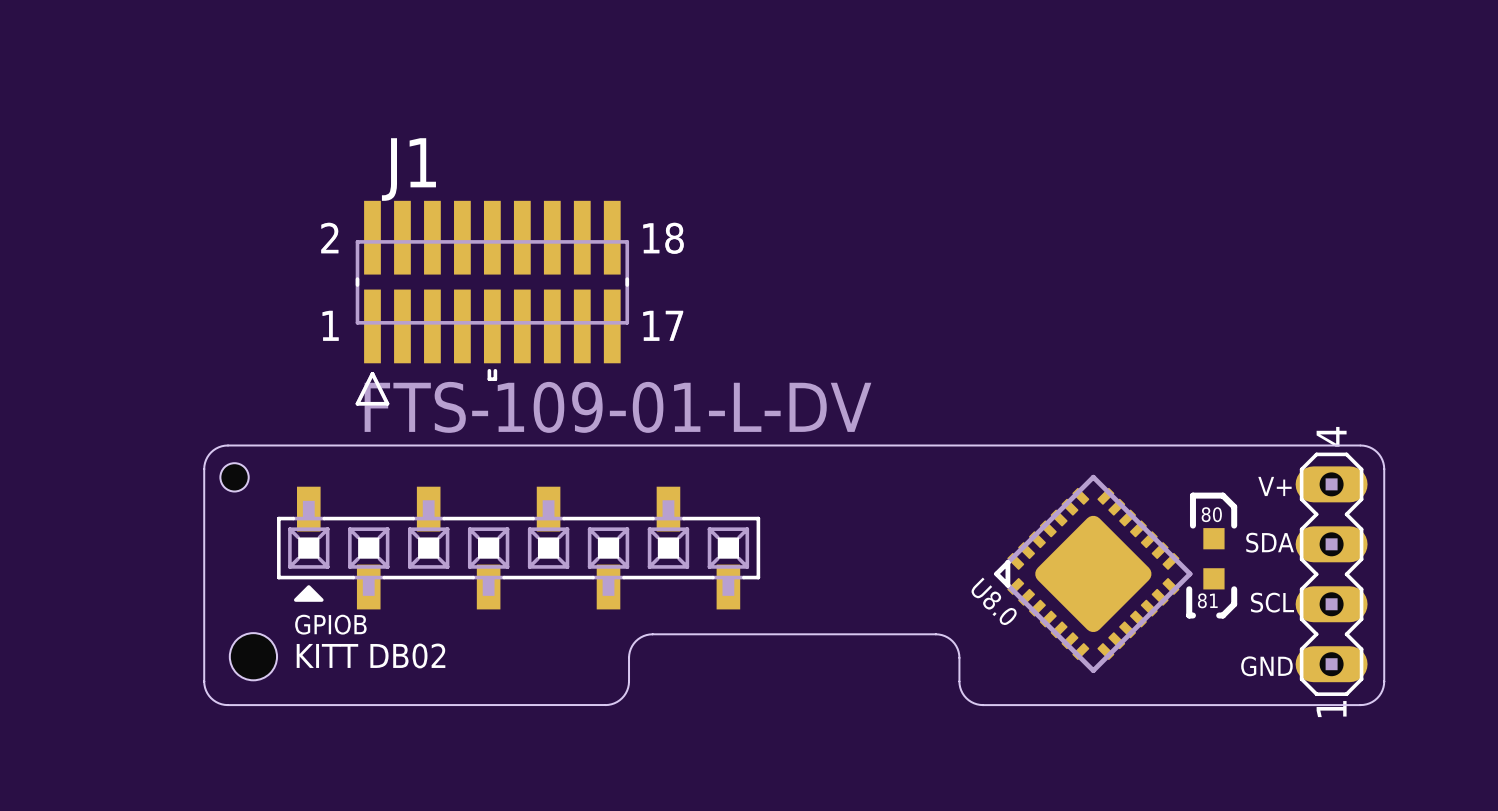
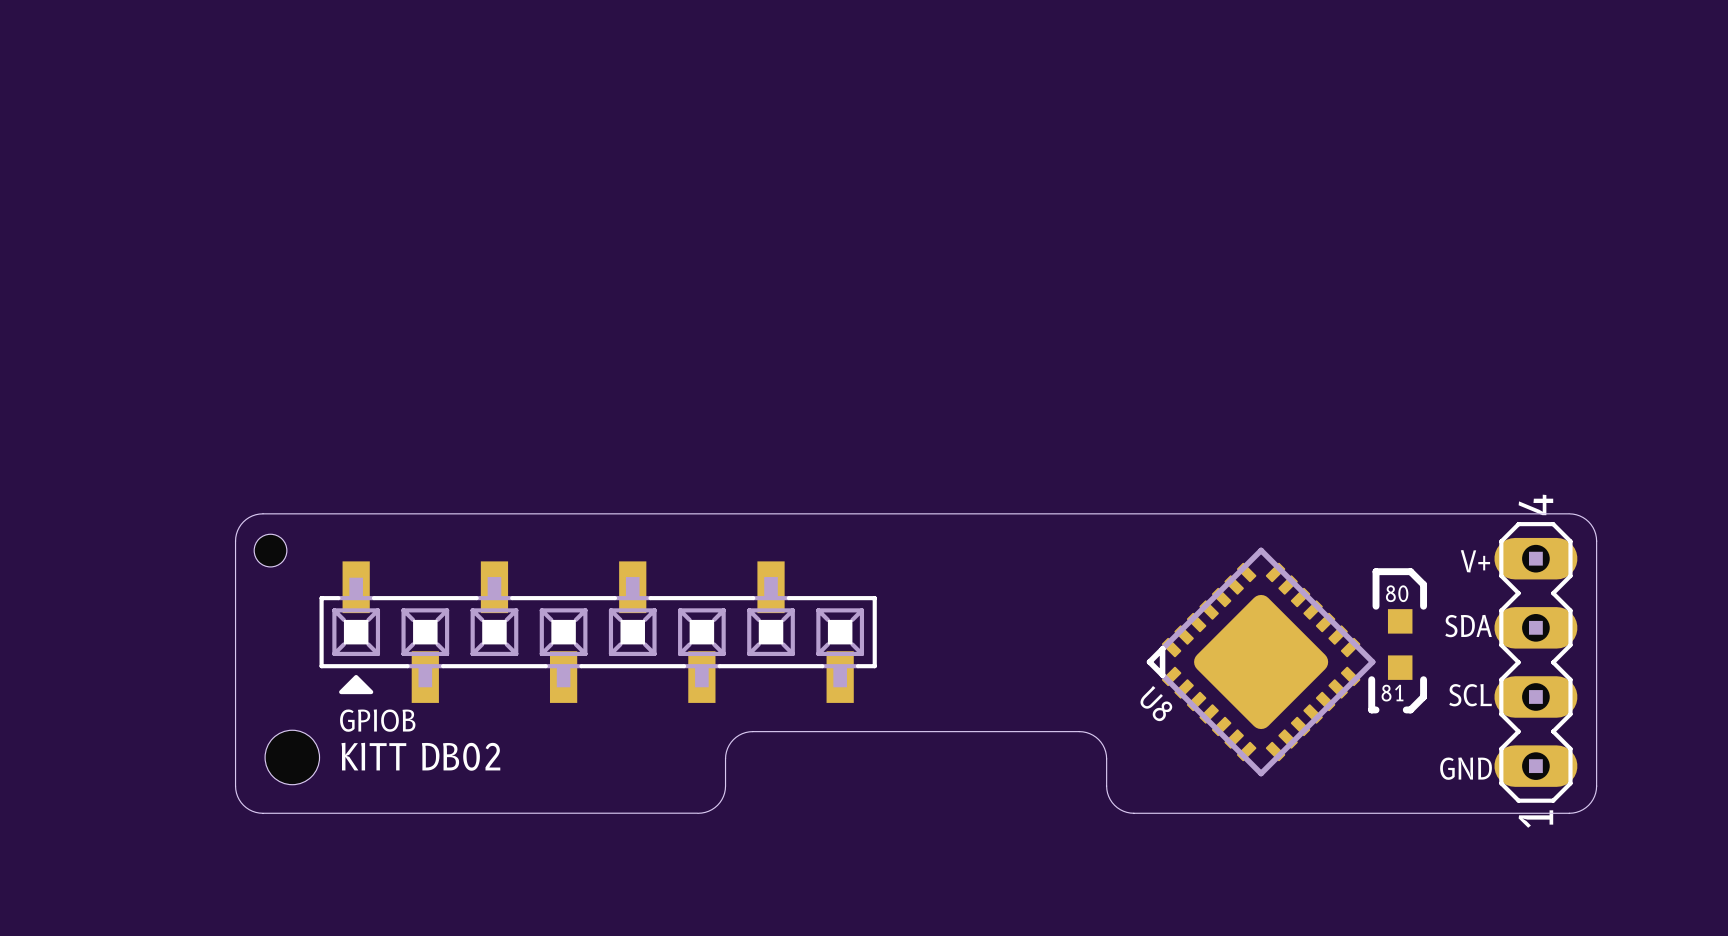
J1: FTS-109-01-L-DV (492, 303) -> none
U8.0 name: U8.0 (994, 601) -> U8 (1156, 703)

